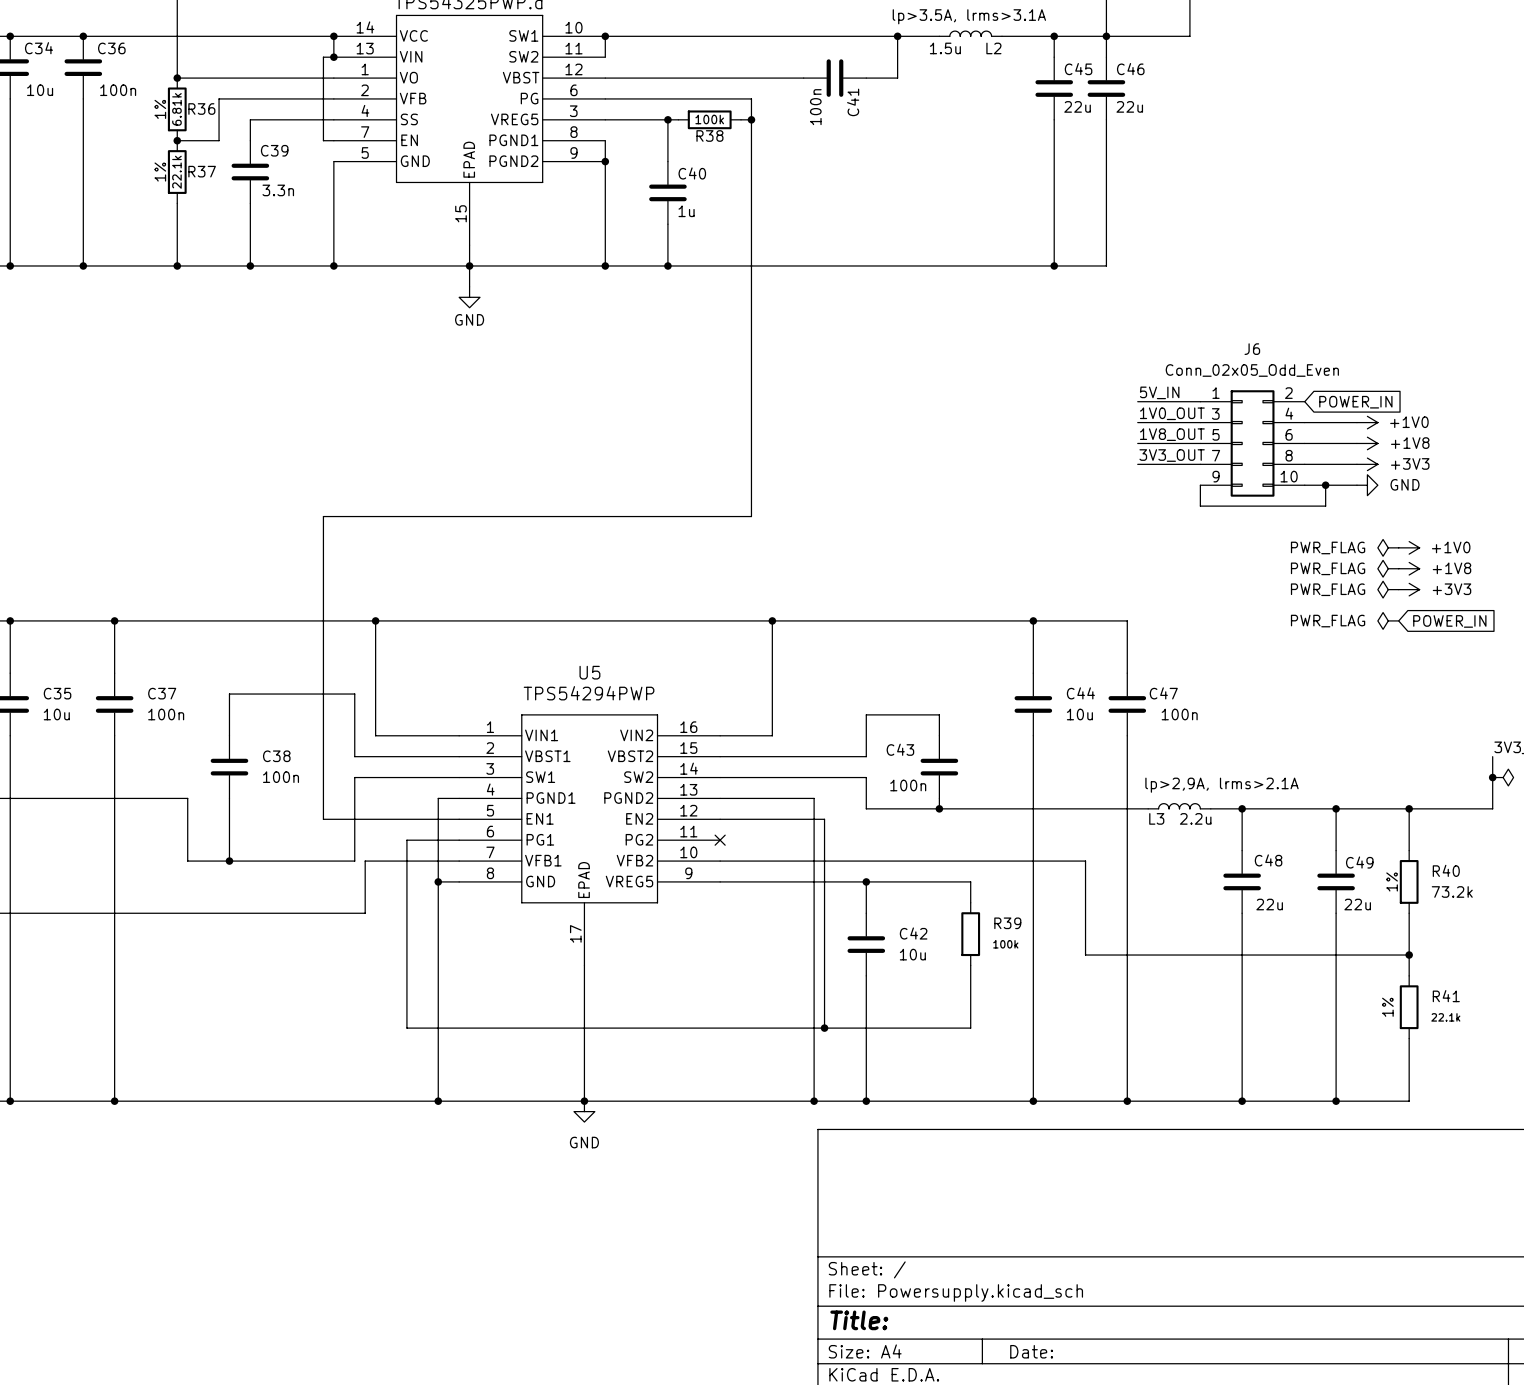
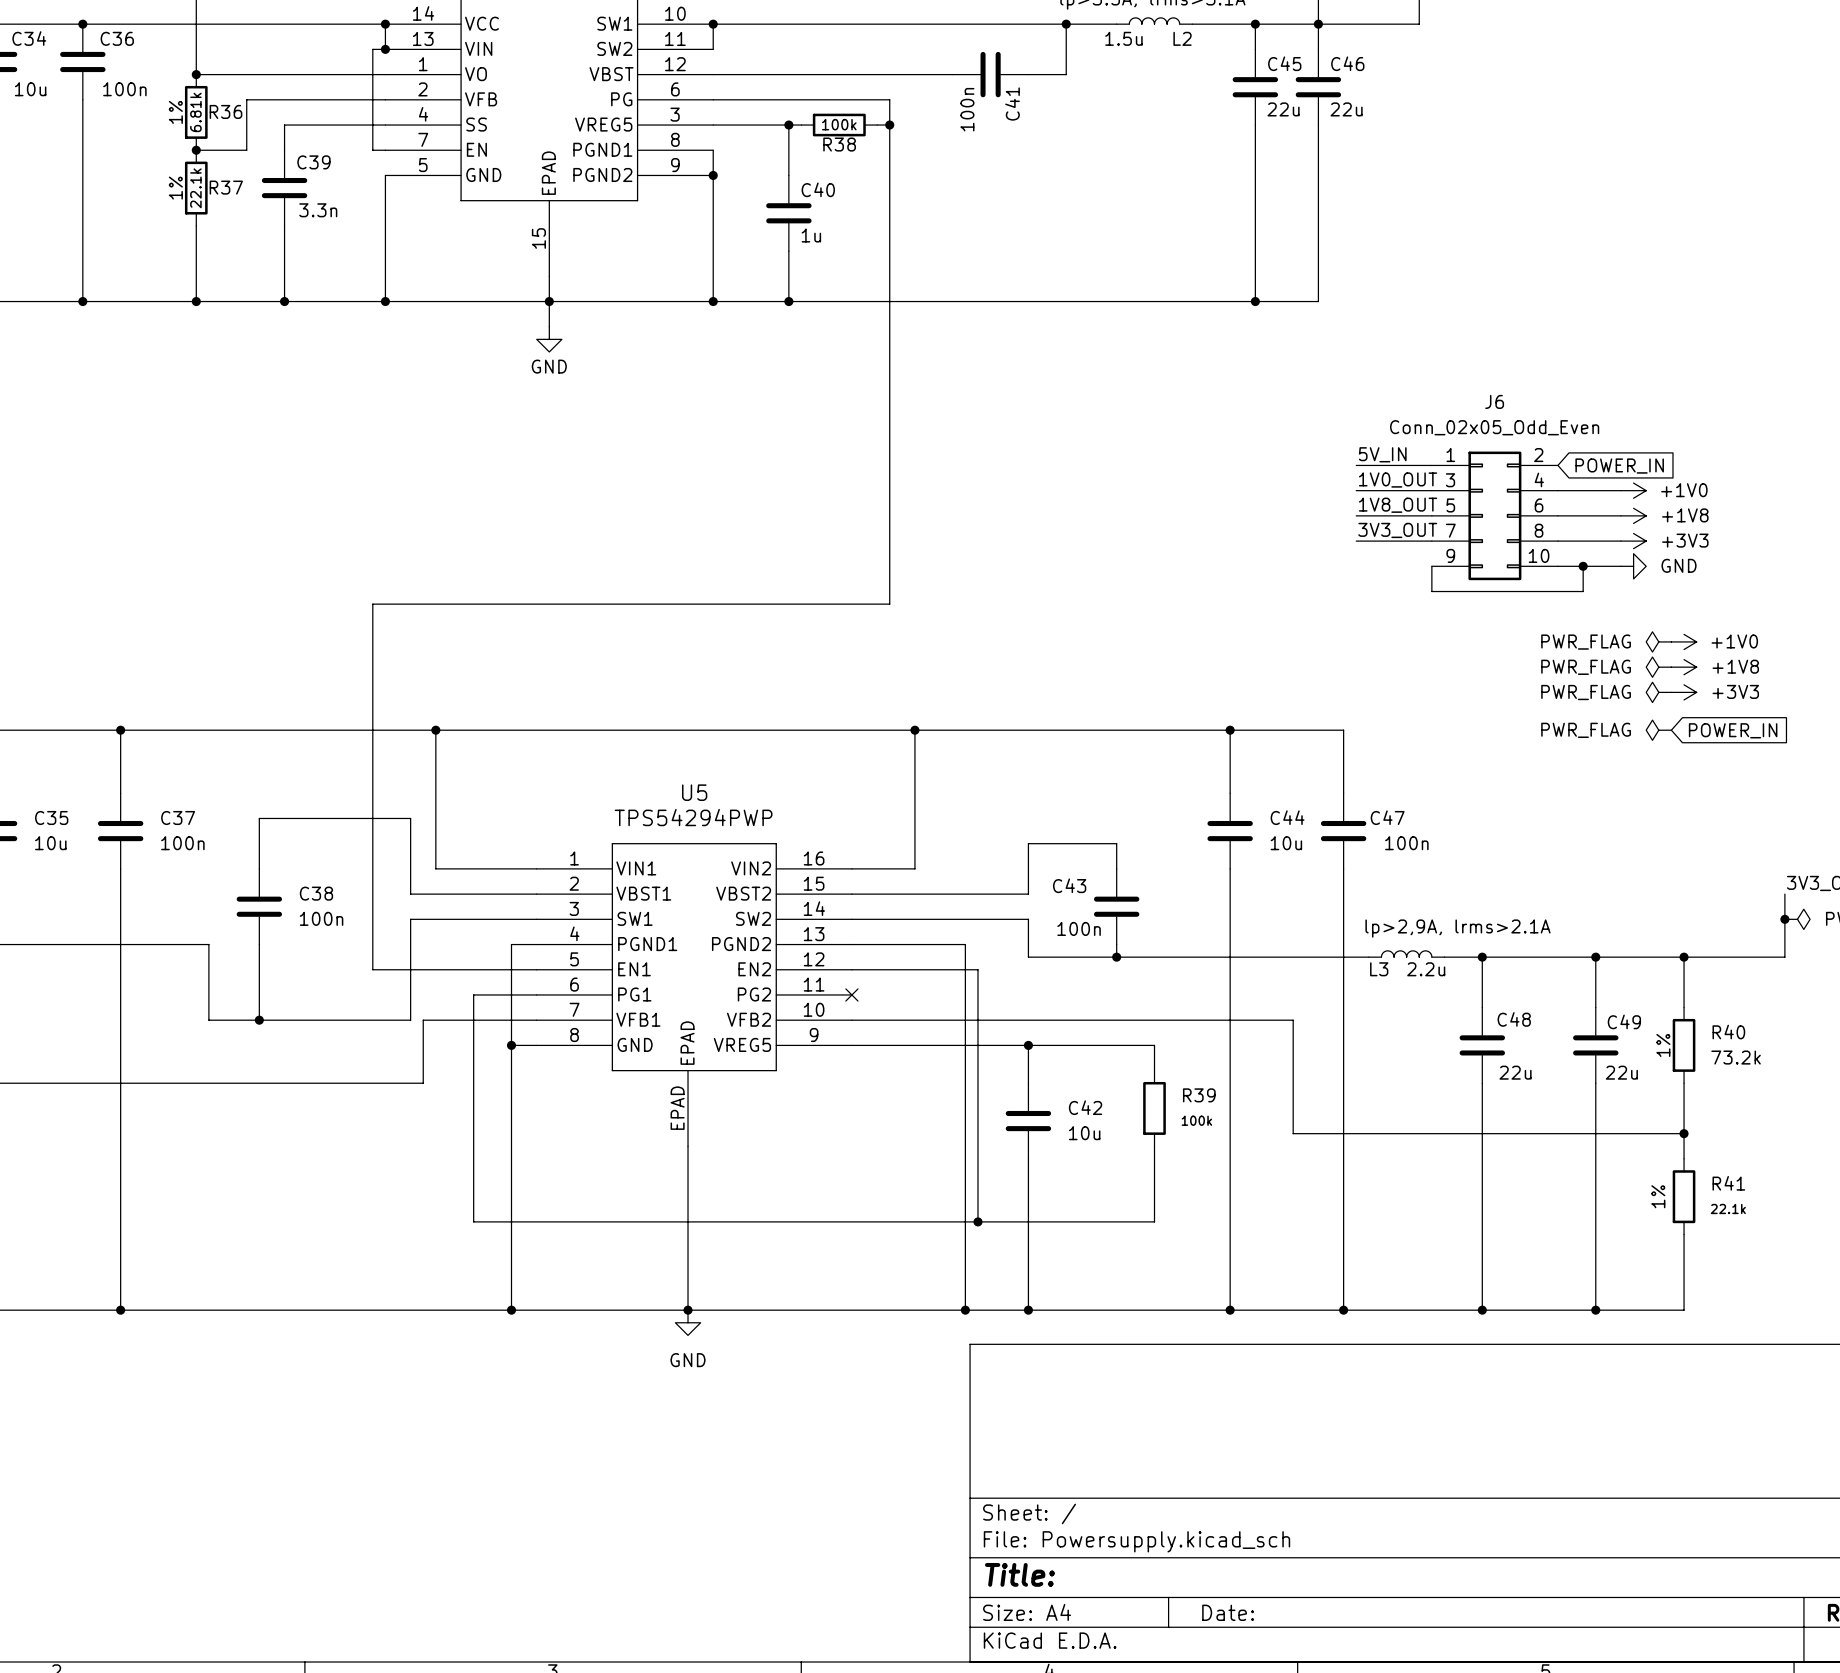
U5 pin number: 17 (575, 933) -> EPAD (677, 1108)

